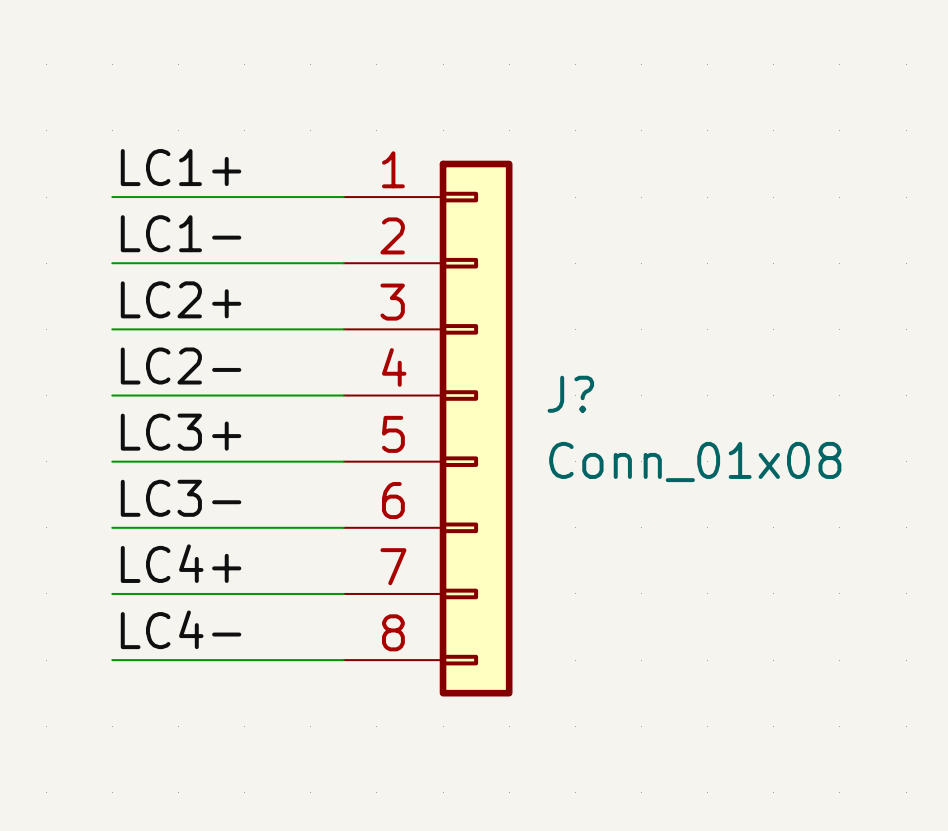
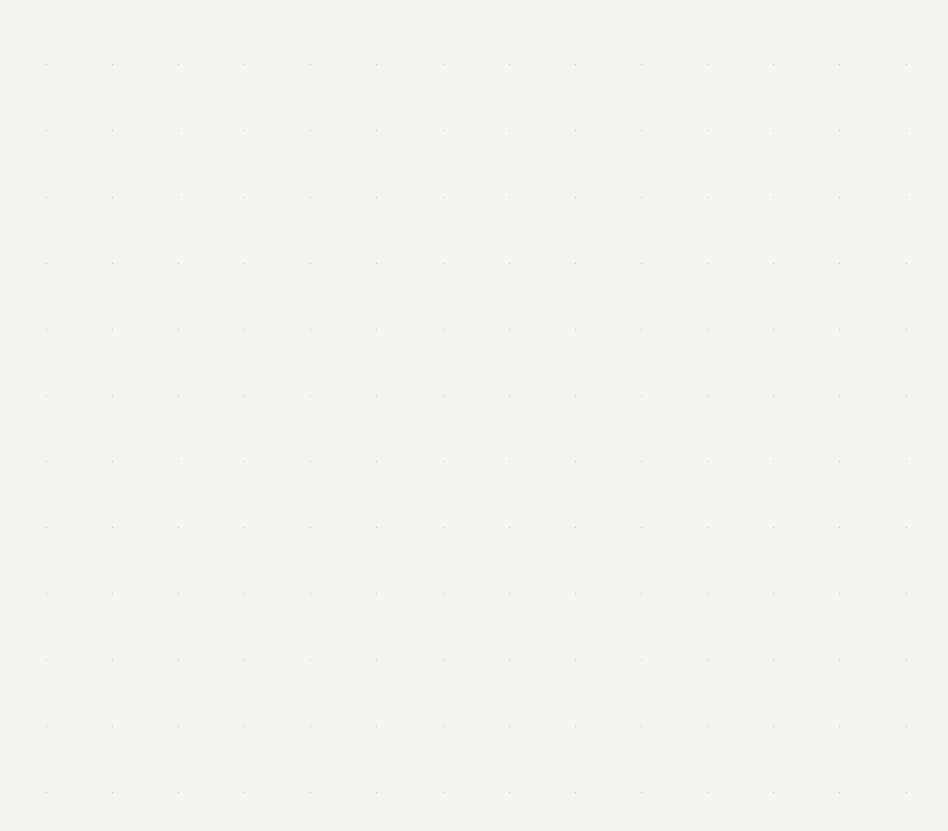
label: LC1+ (181, 167) -> none
wire: (112, 197) (343, 197) -> none
label: LC1- (181, 233) -> none
wire: (112, 263) (343, 263) -> none
label: LC2+ (181, 299) -> none
wire: (112, 329) (343, 329) -> none
label: LC2- (181, 366) -> none
wire: (112, 395) (343, 395) -> none
J?: Conn_01x08 (428, 428) -> none
label: LC3+ (181, 432) -> none
wire: (112, 461) (343, 461) -> none
label: LC3- (181, 498) -> none
wire: (112, 527) (343, 527) -> none
label: LC4+ (181, 563) -> none
wire: (112, 593) (343, 593) -> none
label: LC4- (181, 629) -> none
wire: (112, 660) (343, 660) -> none

